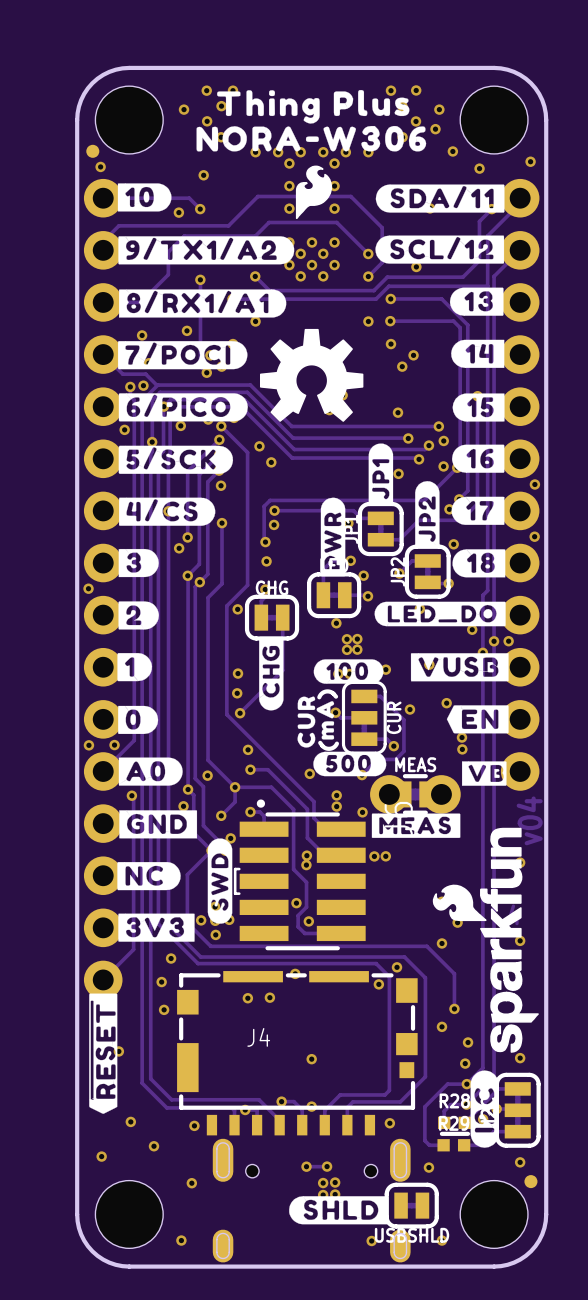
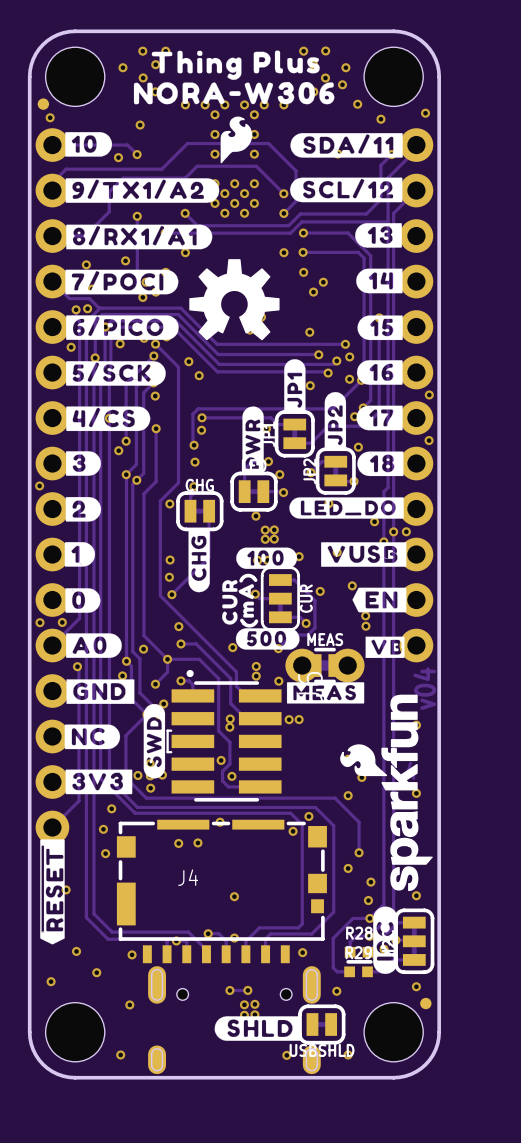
via: (416, 266) -> none

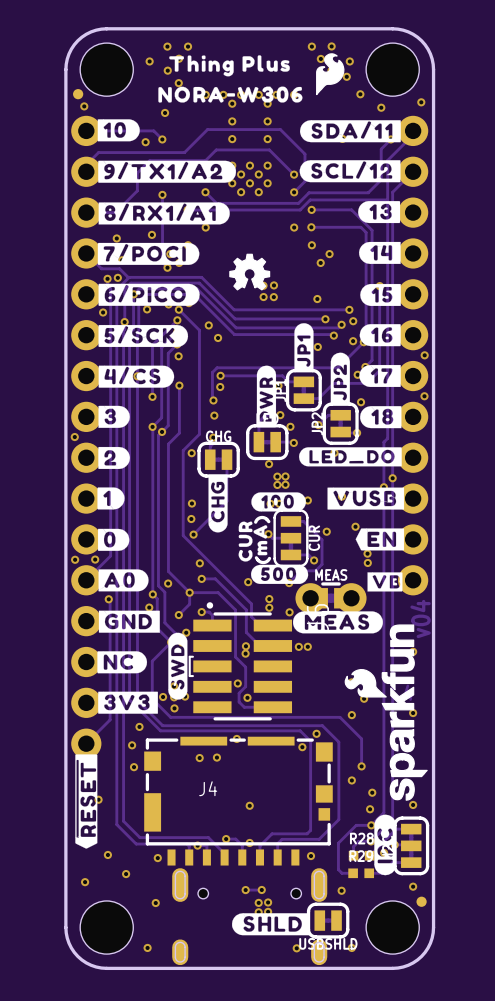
drawing: [133, 50, 335, 105] -> none
drawing: none -> [158, 55, 303, 103]
drawing position: (236, 139) -> (330, 74)
drawing shape: [189, 259, 280, 341] -> [229, 253, 271, 291]
via: (118, 450) -> none
via: (374, 521) -> none
via: (406, 531) -> none
drawing shape: [286, 682, 365, 704] -> [293, 611, 383, 634]
line: (370, 961) (348, 961) -> none

